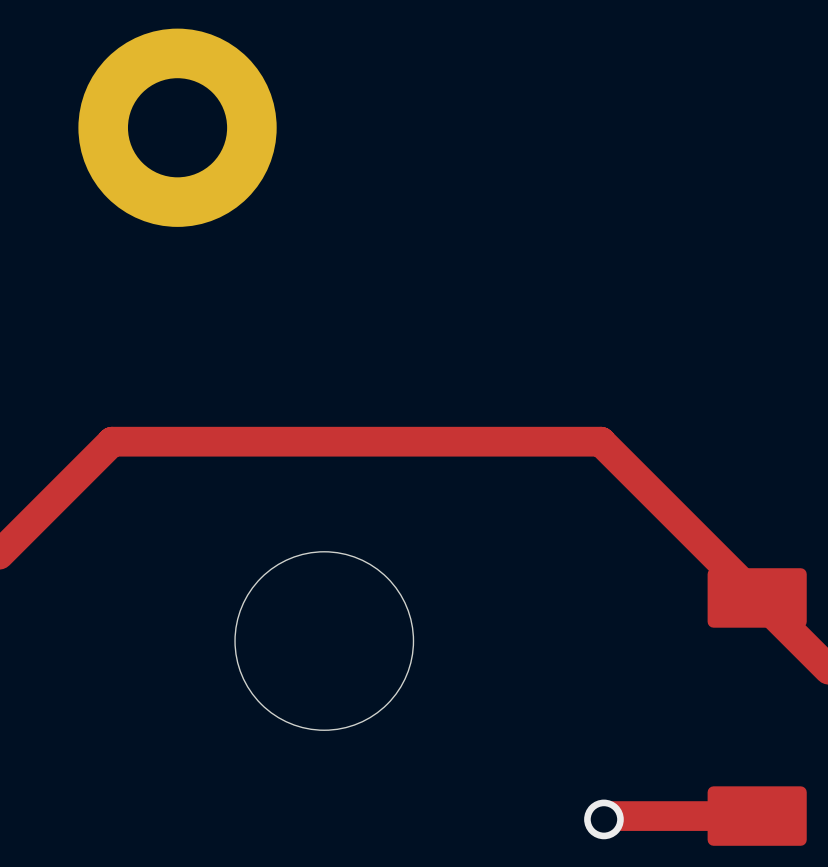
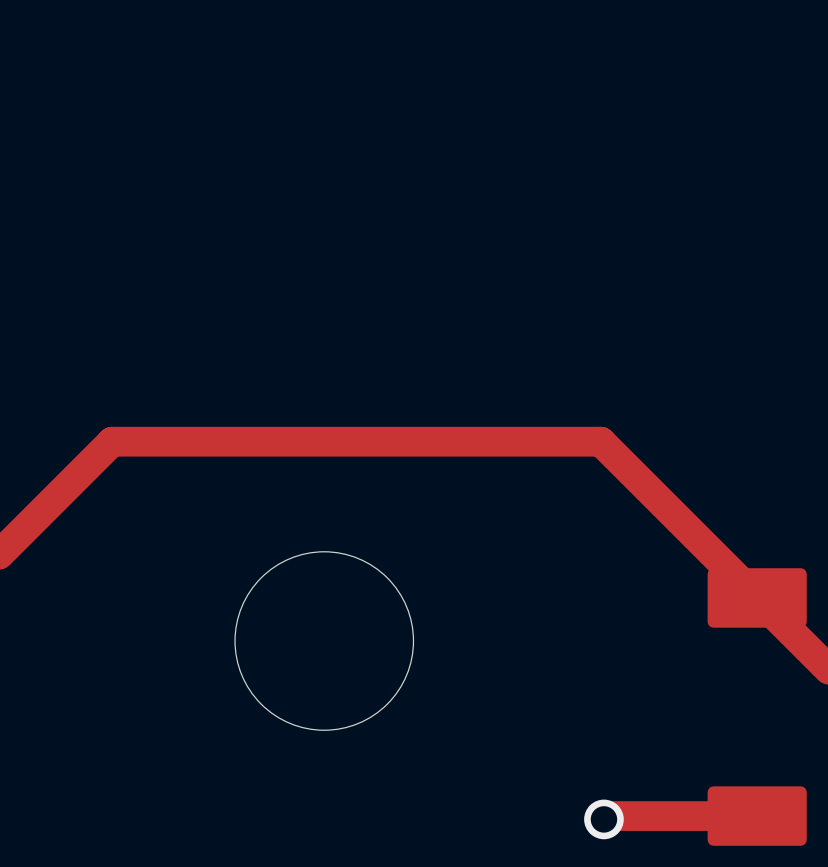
part: (177, 127) -> none

